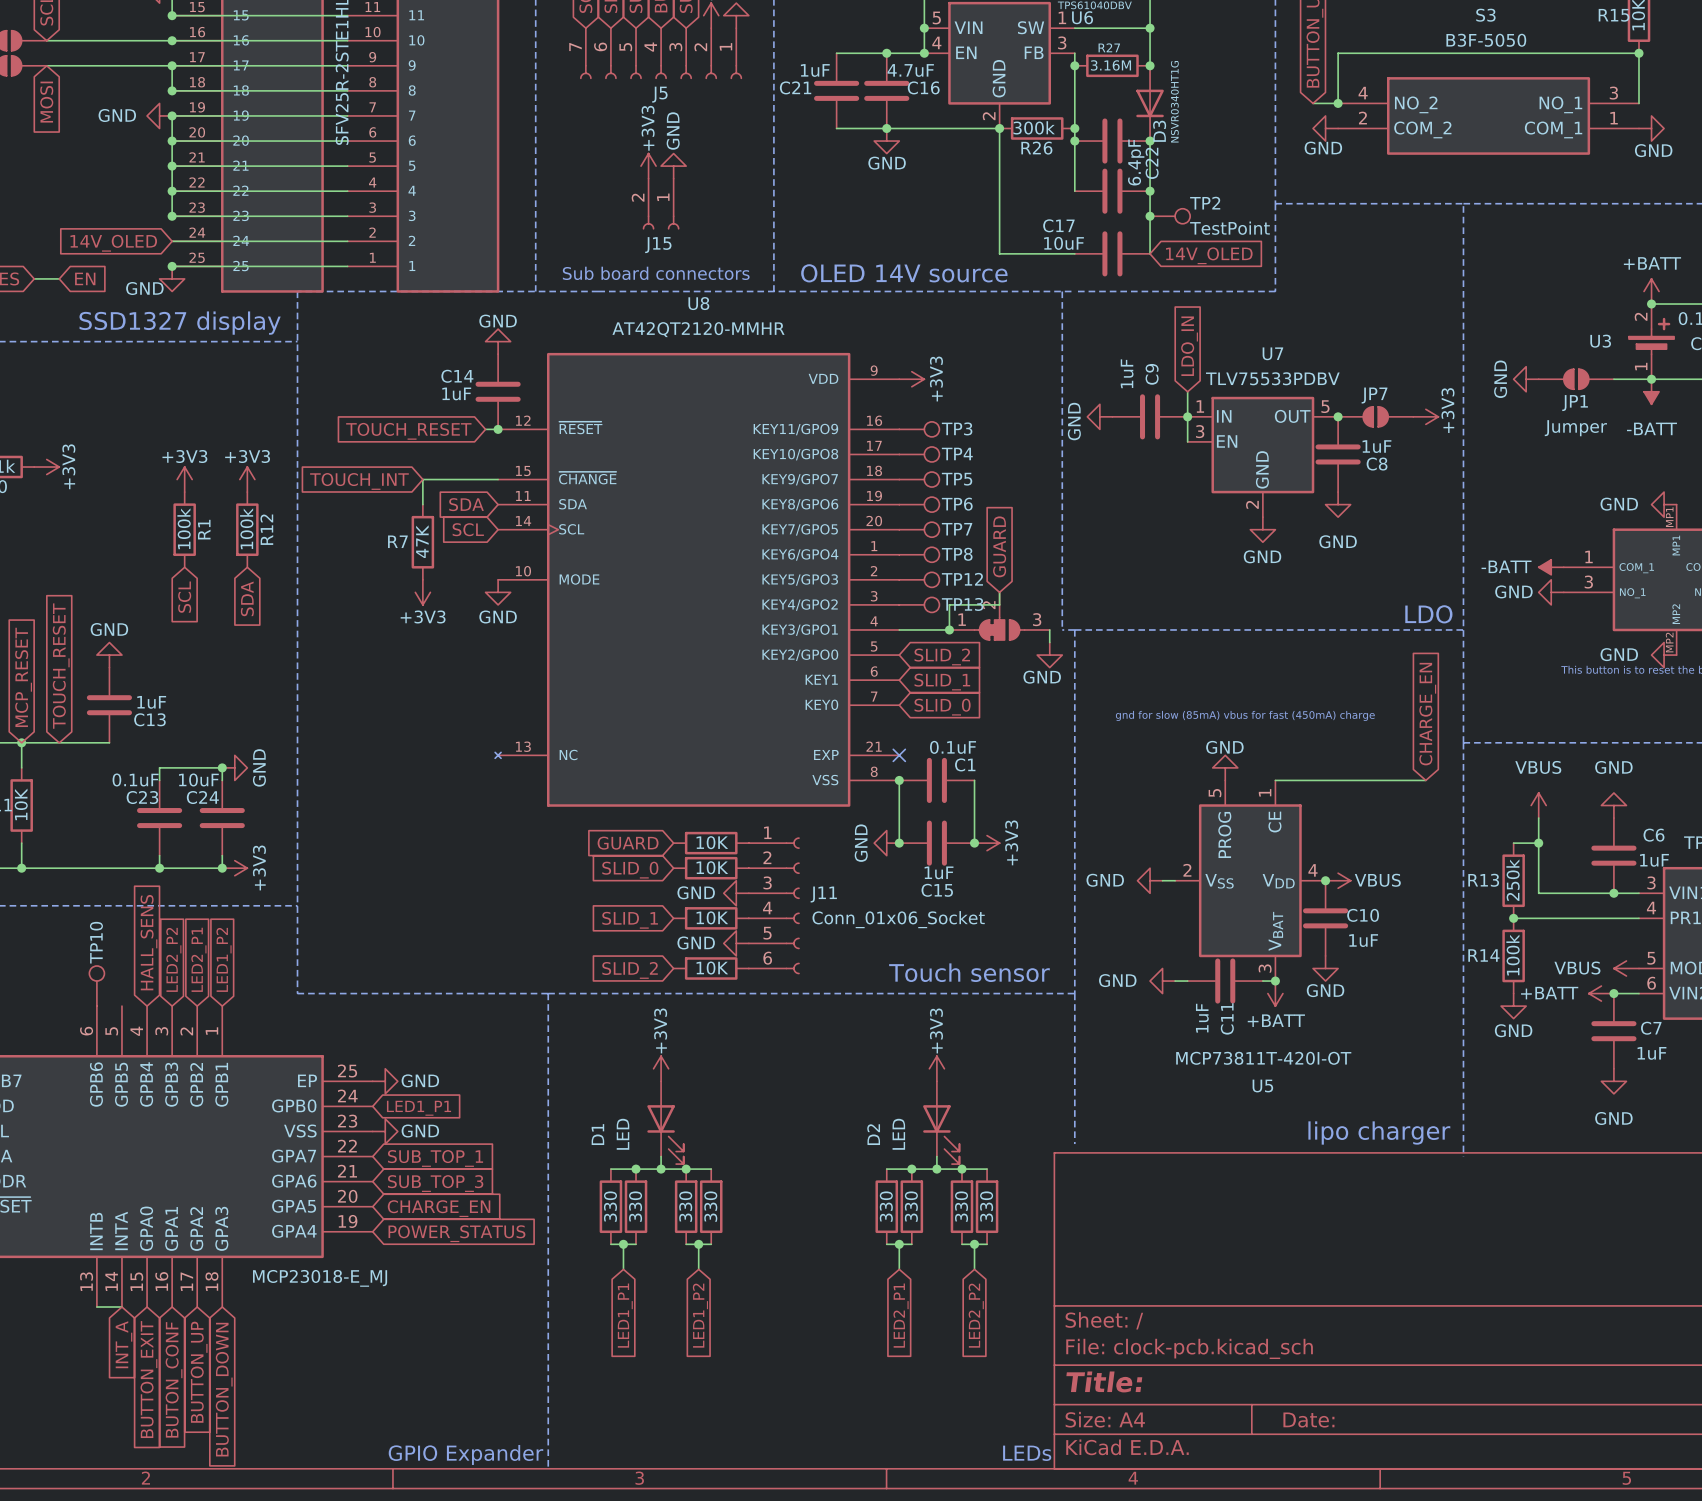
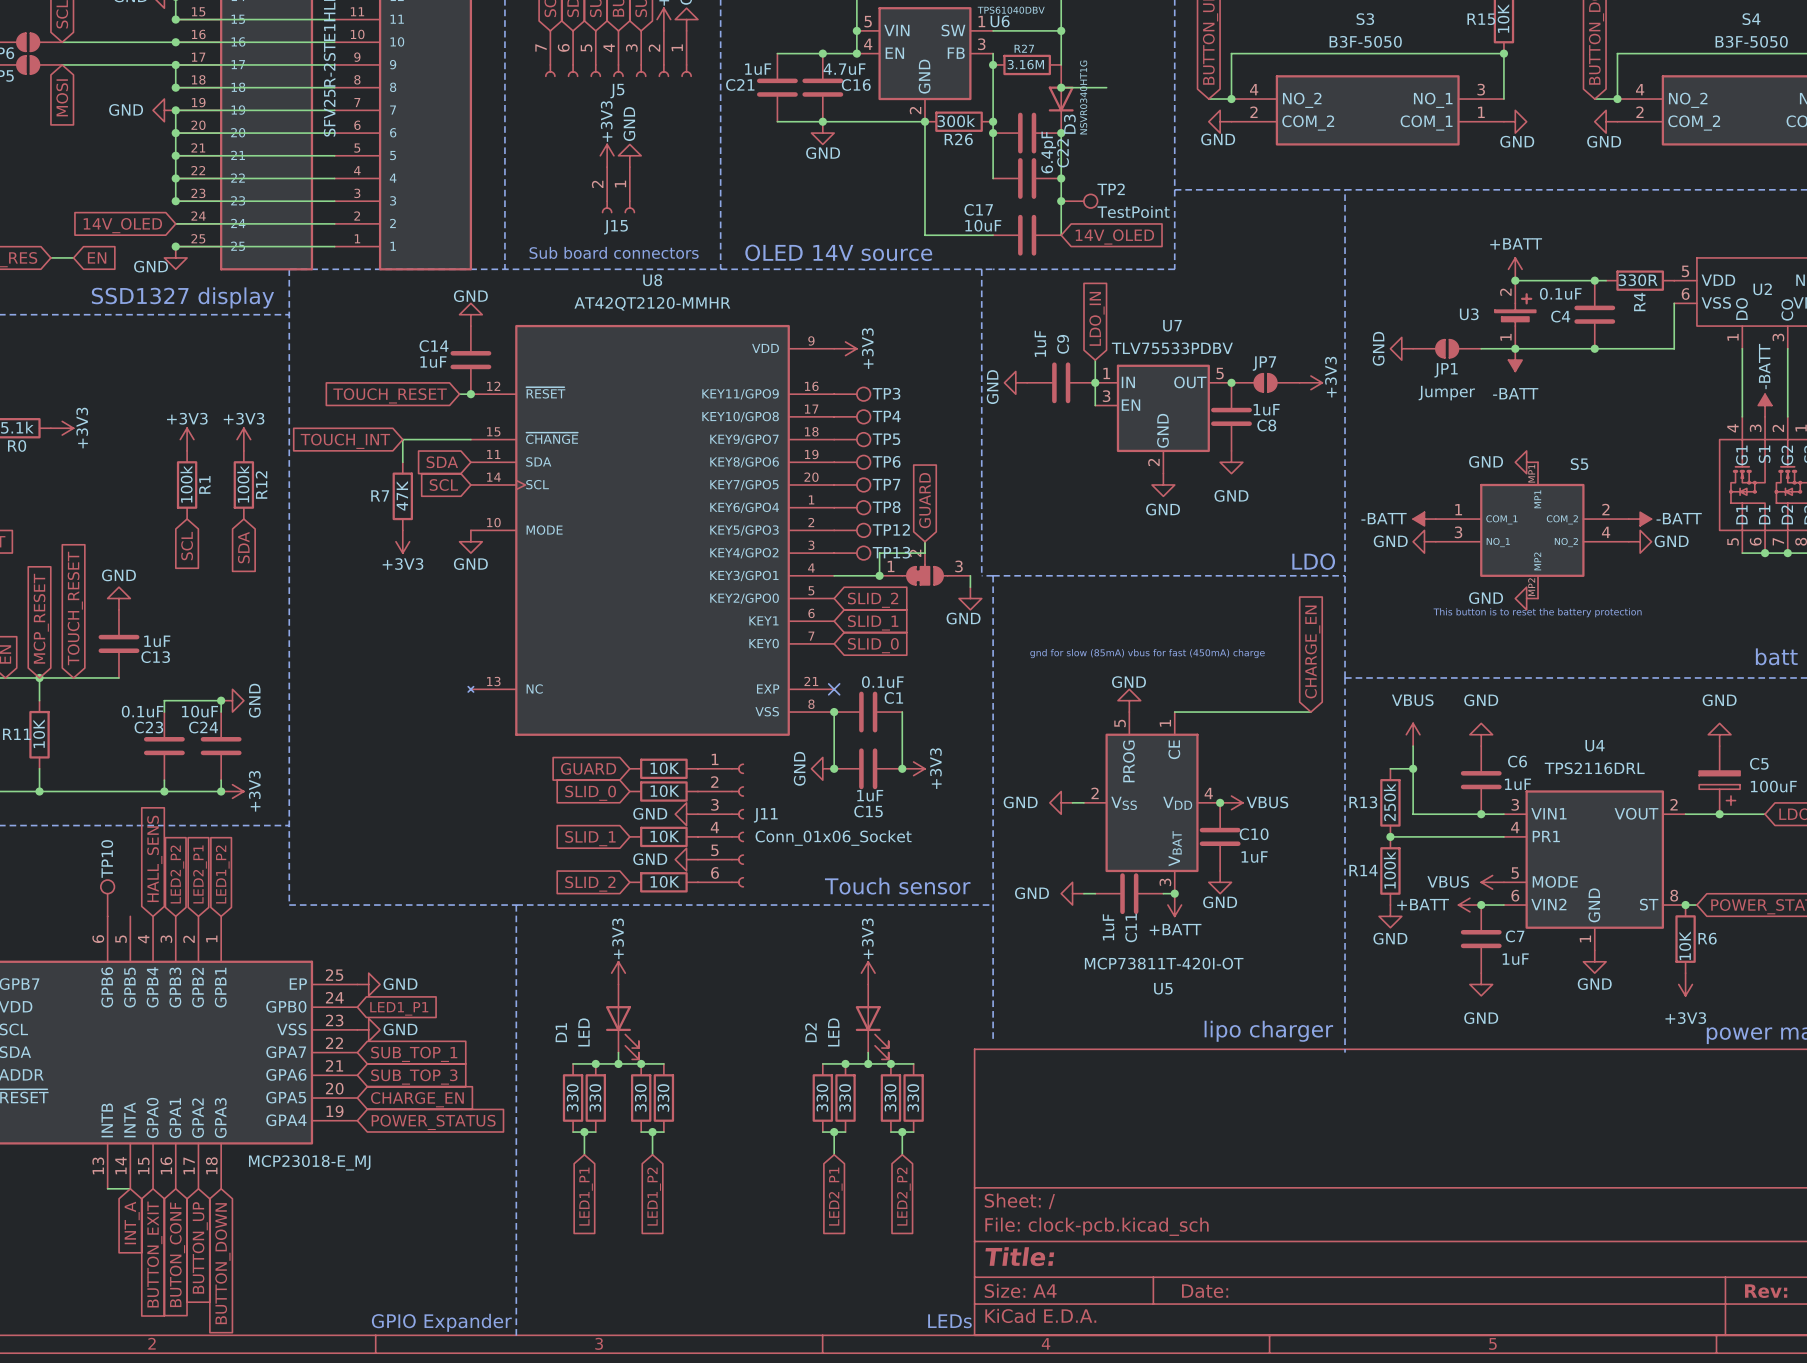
junction position: (1150, 65) -> (1061, 87)
wire: none -> (1061, 87) (1106, 87)

